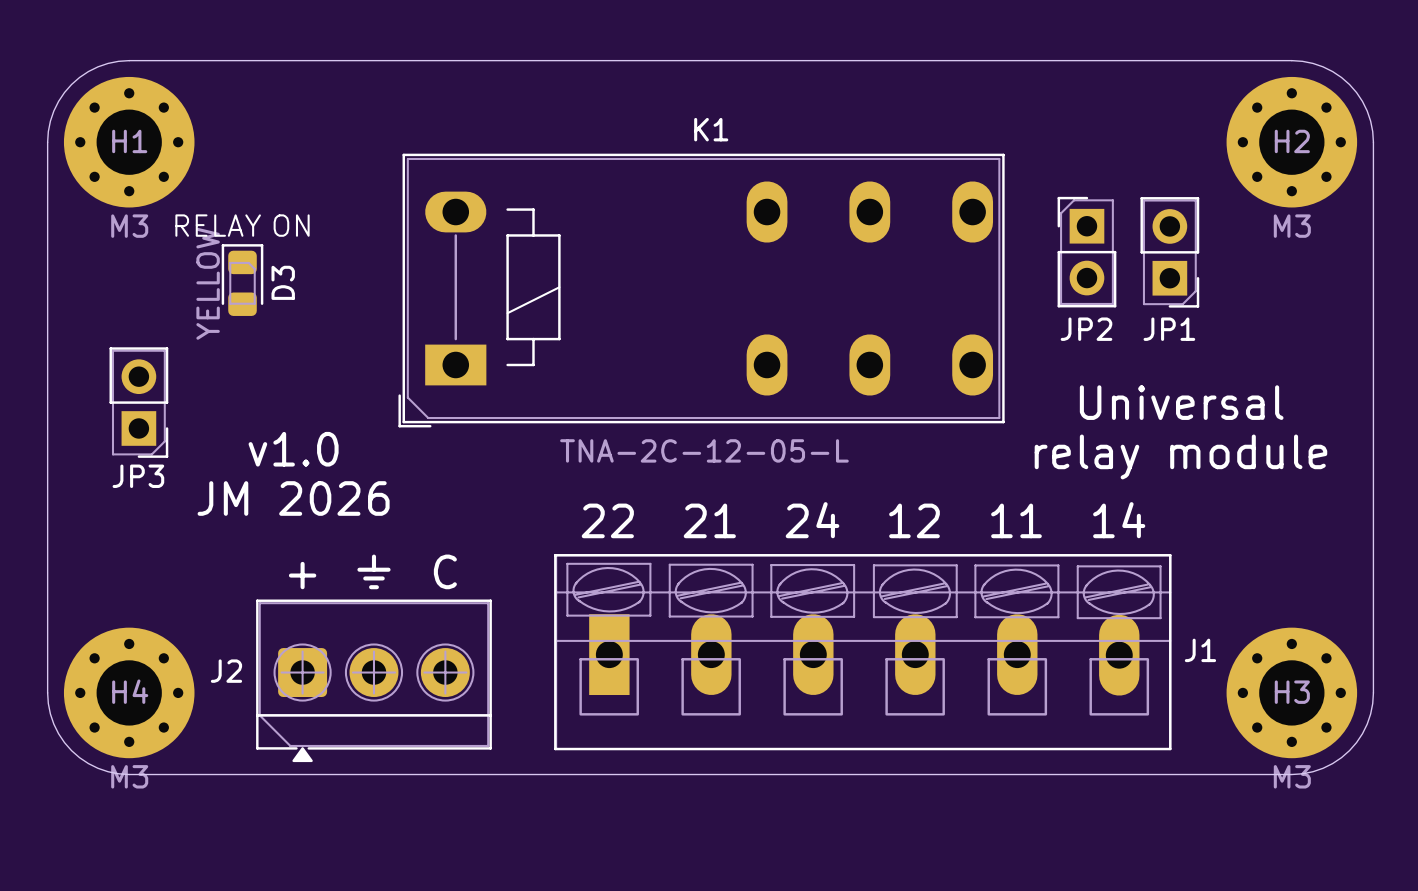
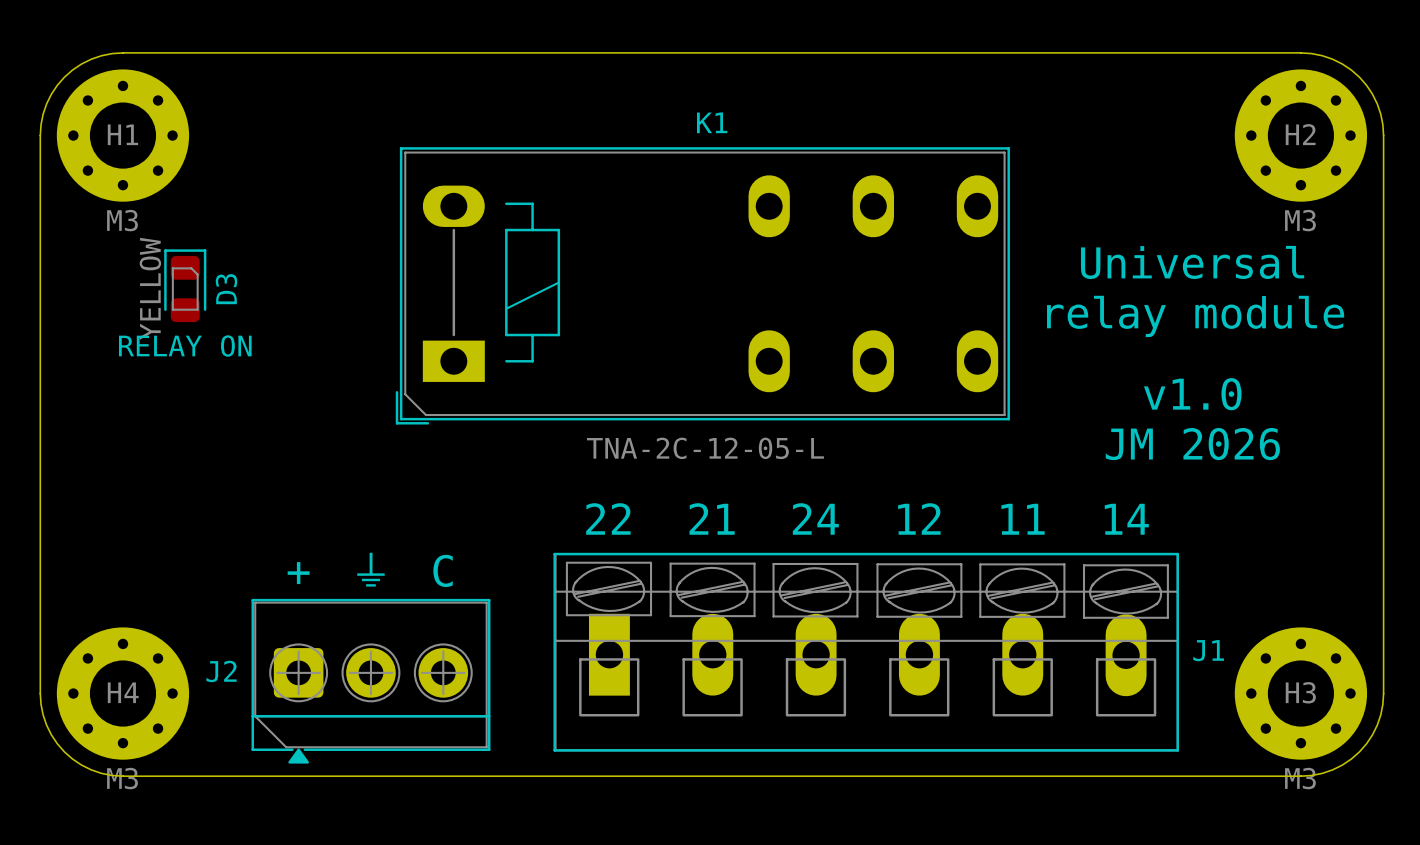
text position: RELAY ON (242, 225) -> RELAY ON (185, 346)
JP2: (1086, 252) -> none
JP1: (1169, 252) -> none
text: none -> Universal (1192, 262)
D3 position: (242, 280) -> (185, 285)
text: none -> relay module (1195, 316)
JP3: (138, 402) -> none
text: Universal (1181, 402) -> v1.0 (1192, 394)
text: v1.0 (293, 449) -> none
text: relay module (1180, 456) -> JM 2026 (1192, 444)
text: JM 2026 (293, 498) -> none

